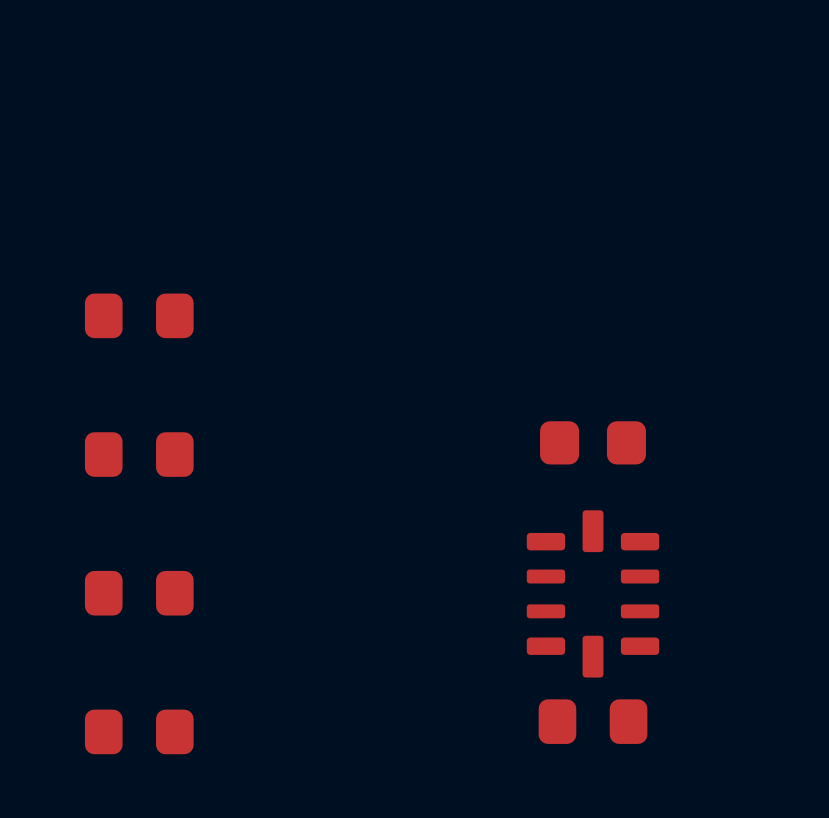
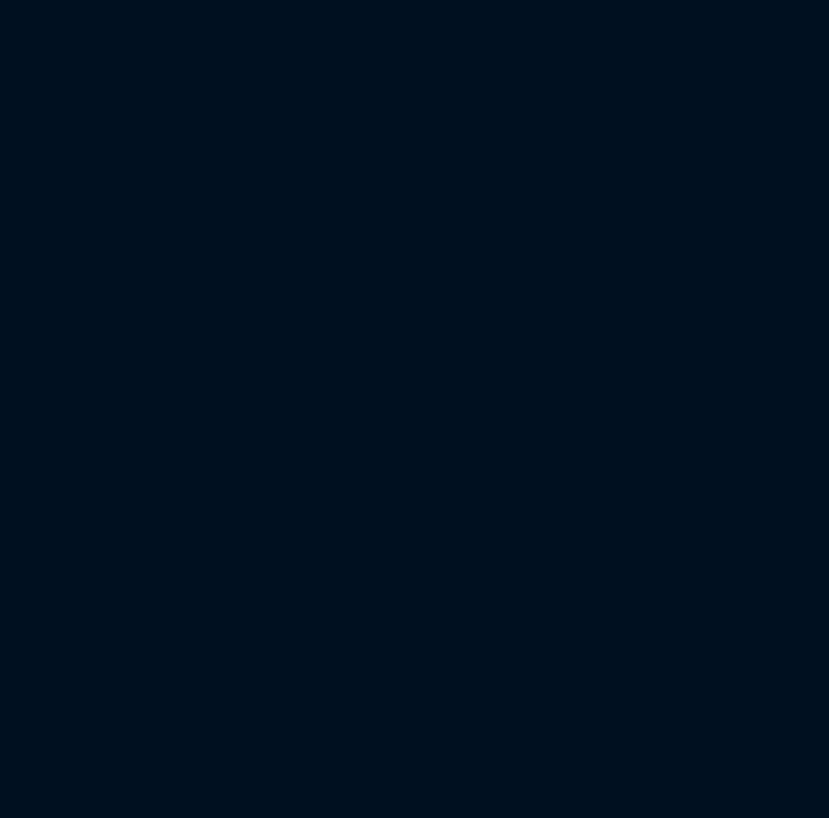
part: (139, 315) -> none
part: (593, 442) -> none
part: (139, 454) -> none
part: (139, 593) -> none
part: (593, 593) -> none
part: (593, 721) -> none
part: (139, 731) -> none

